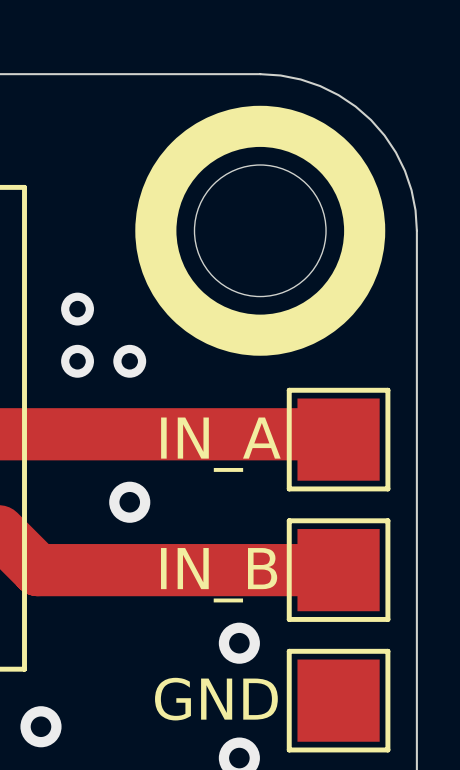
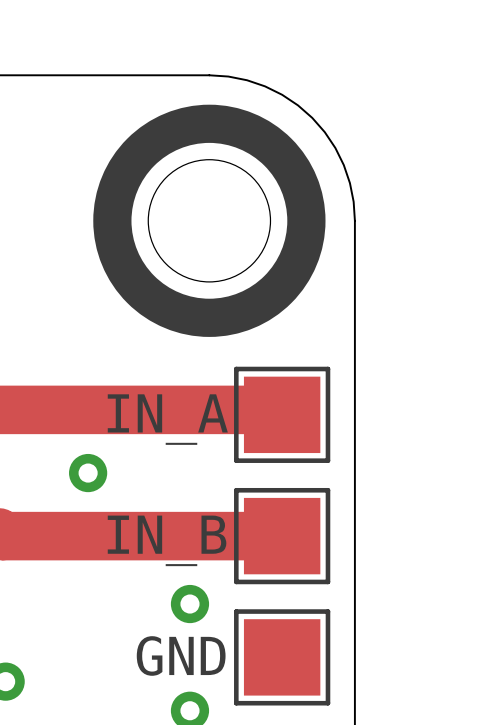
via: (77, 309) -> none
via: (77, 361) -> none
via: (129, 361) -> none

